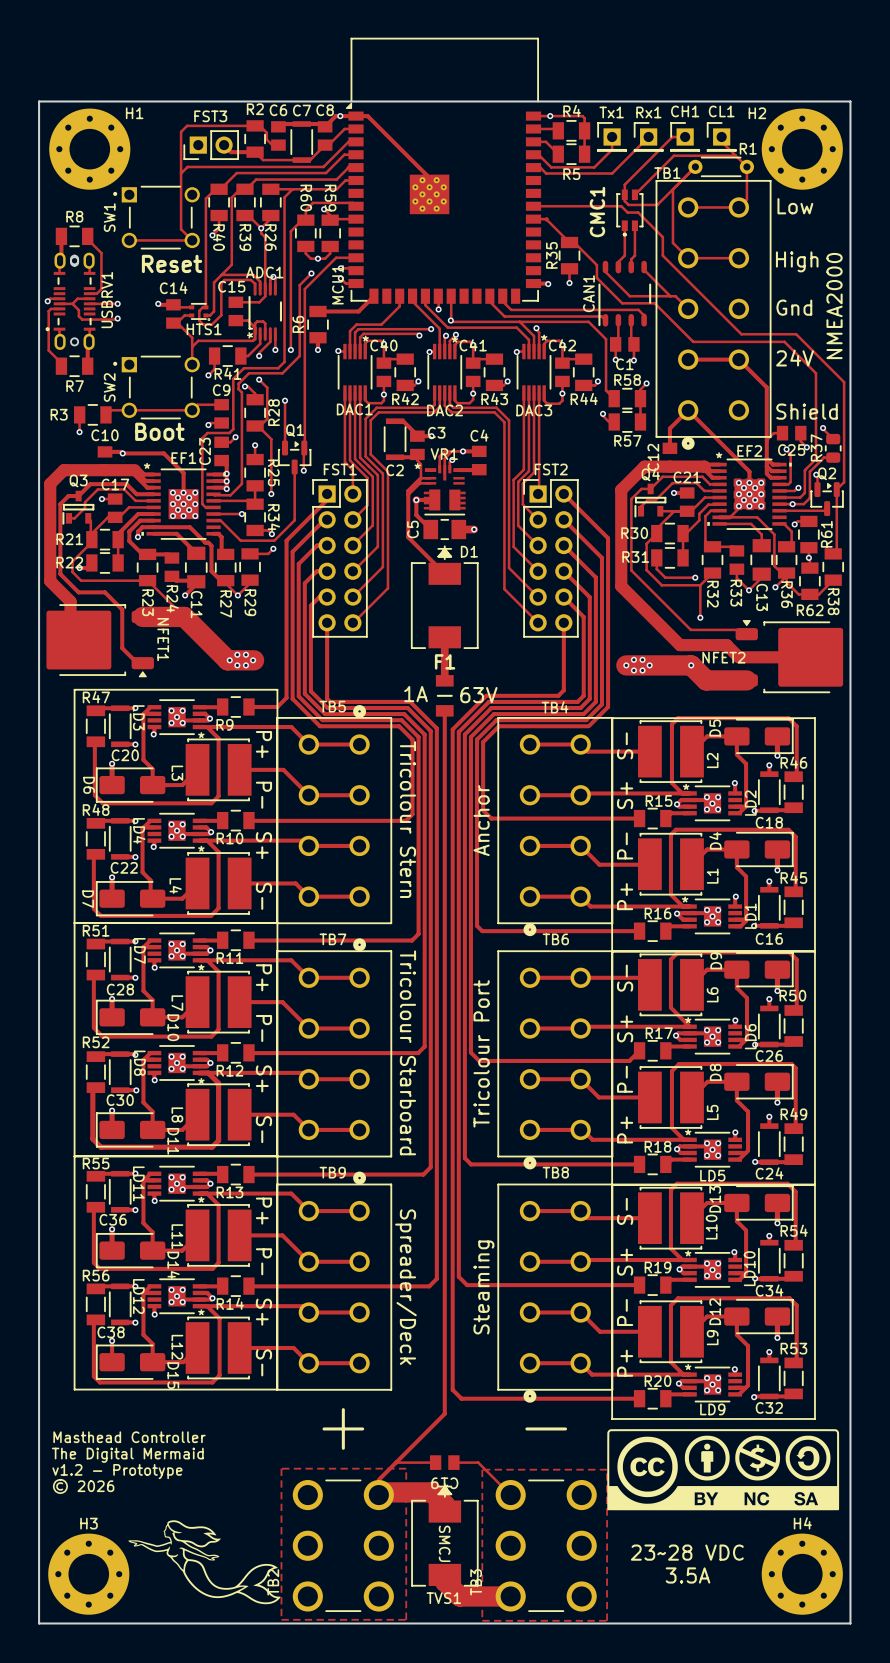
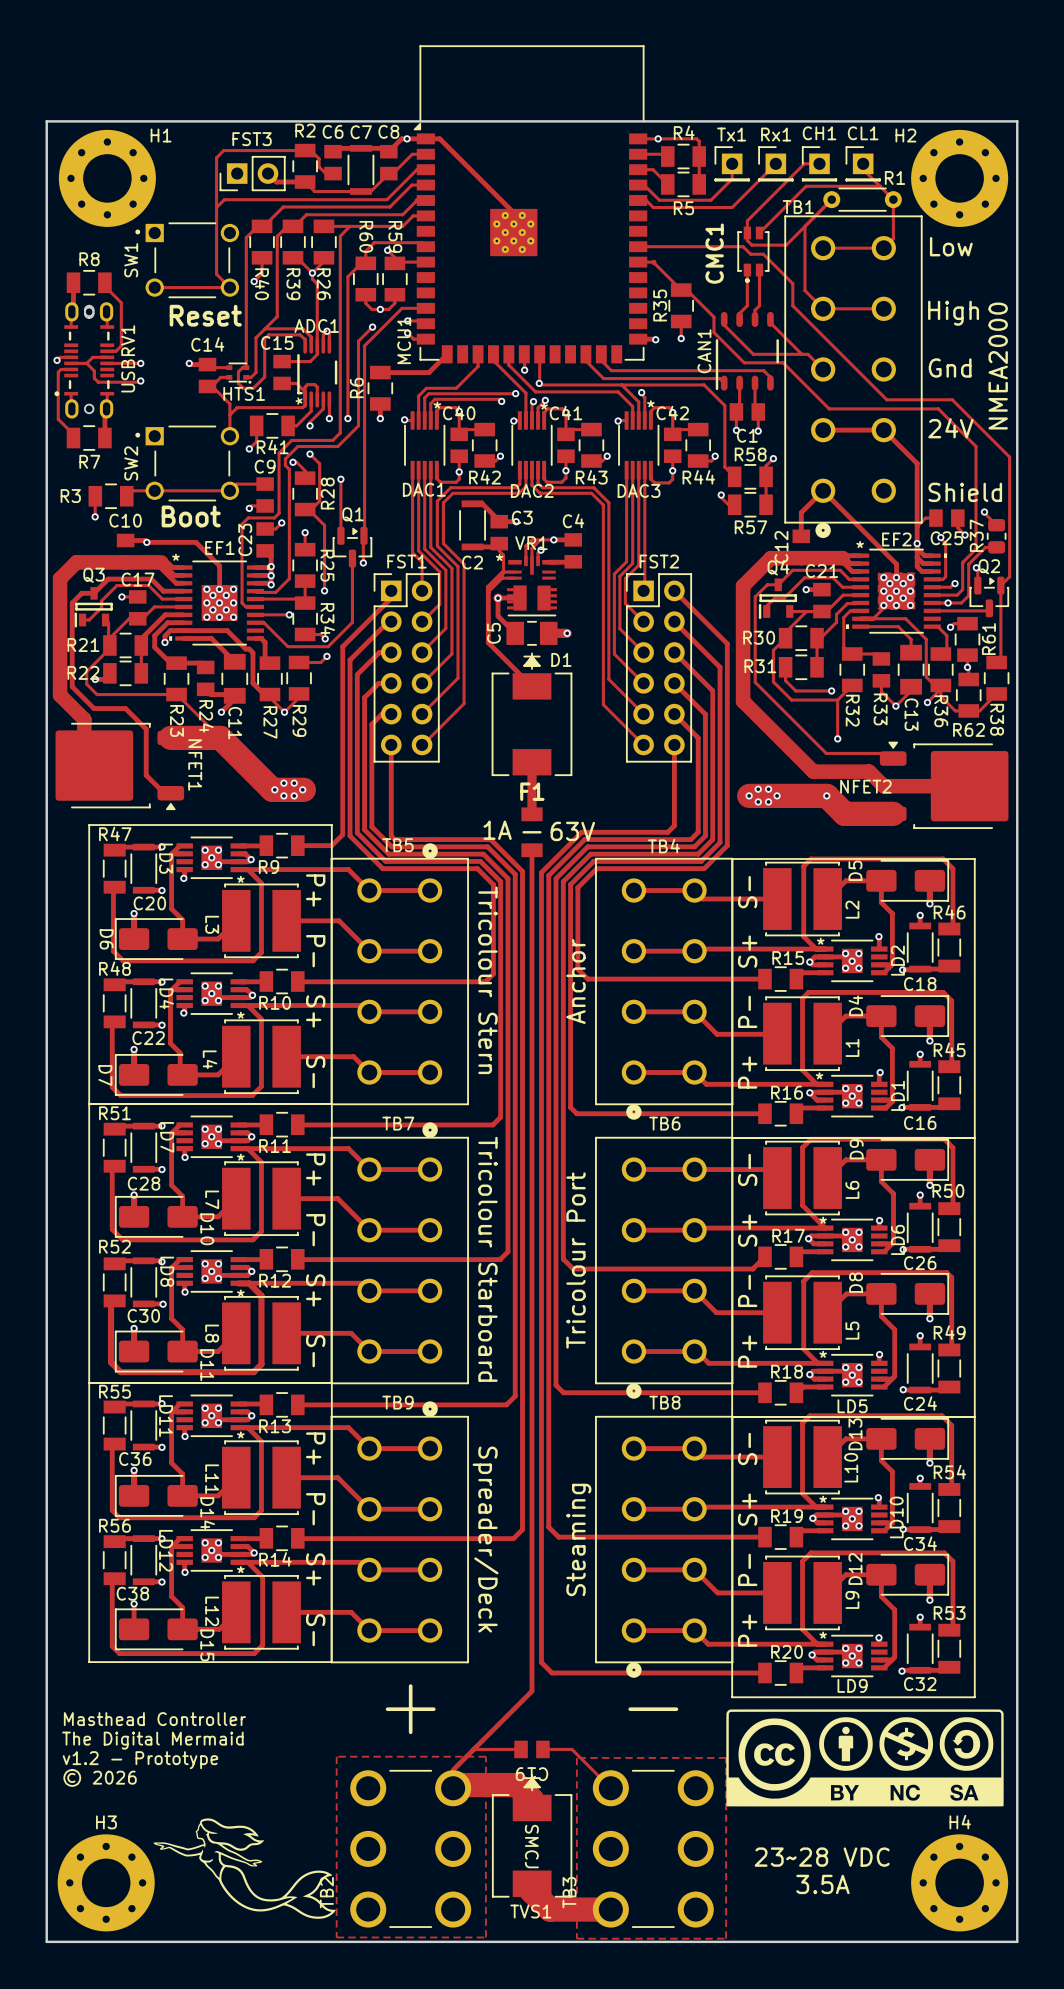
via: none -> (917, 543)

